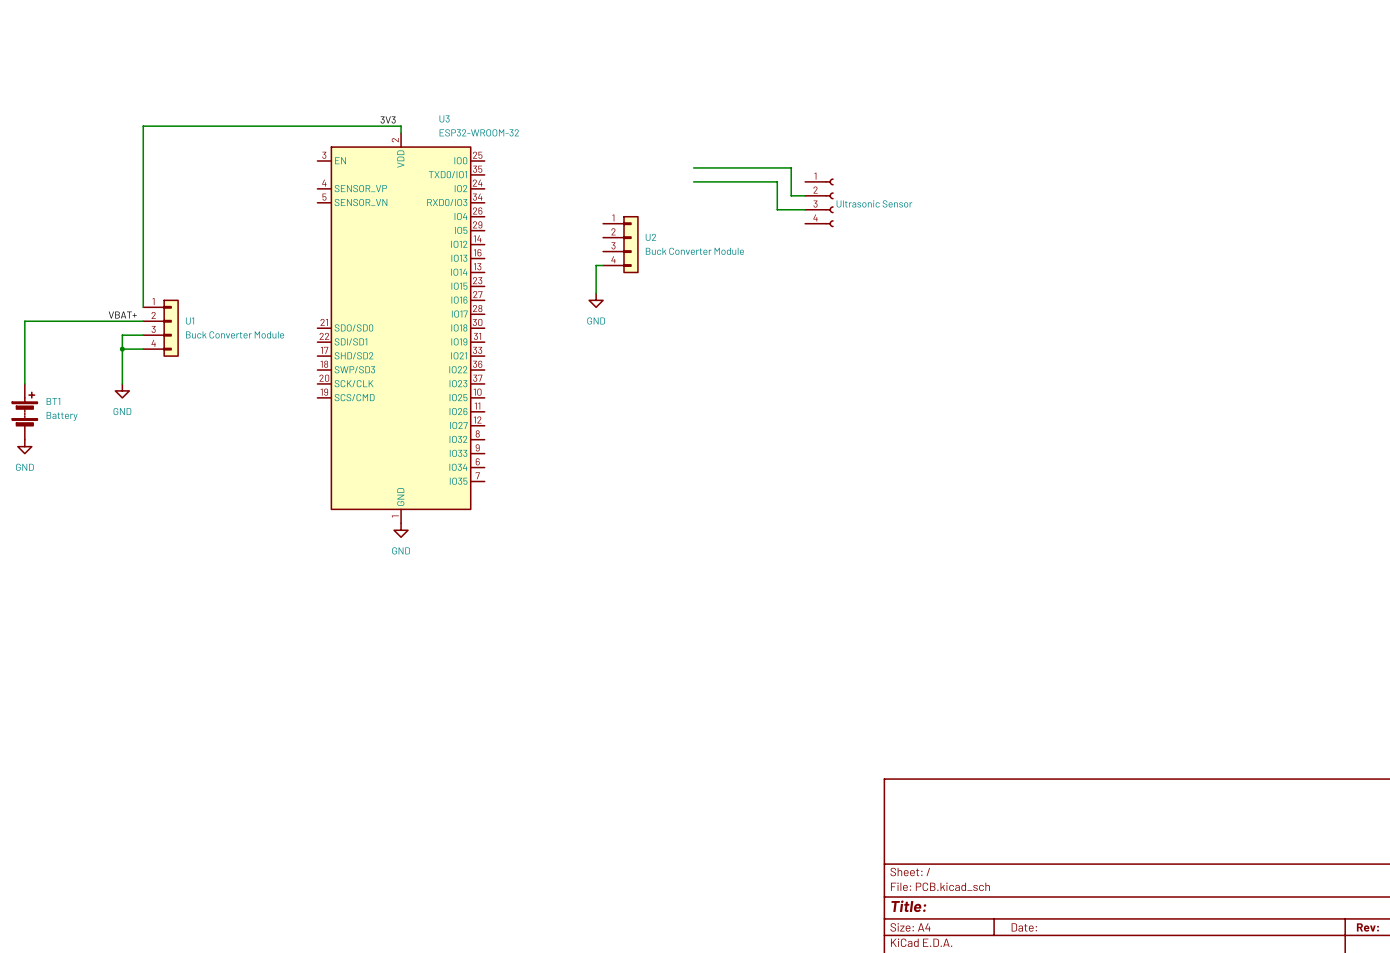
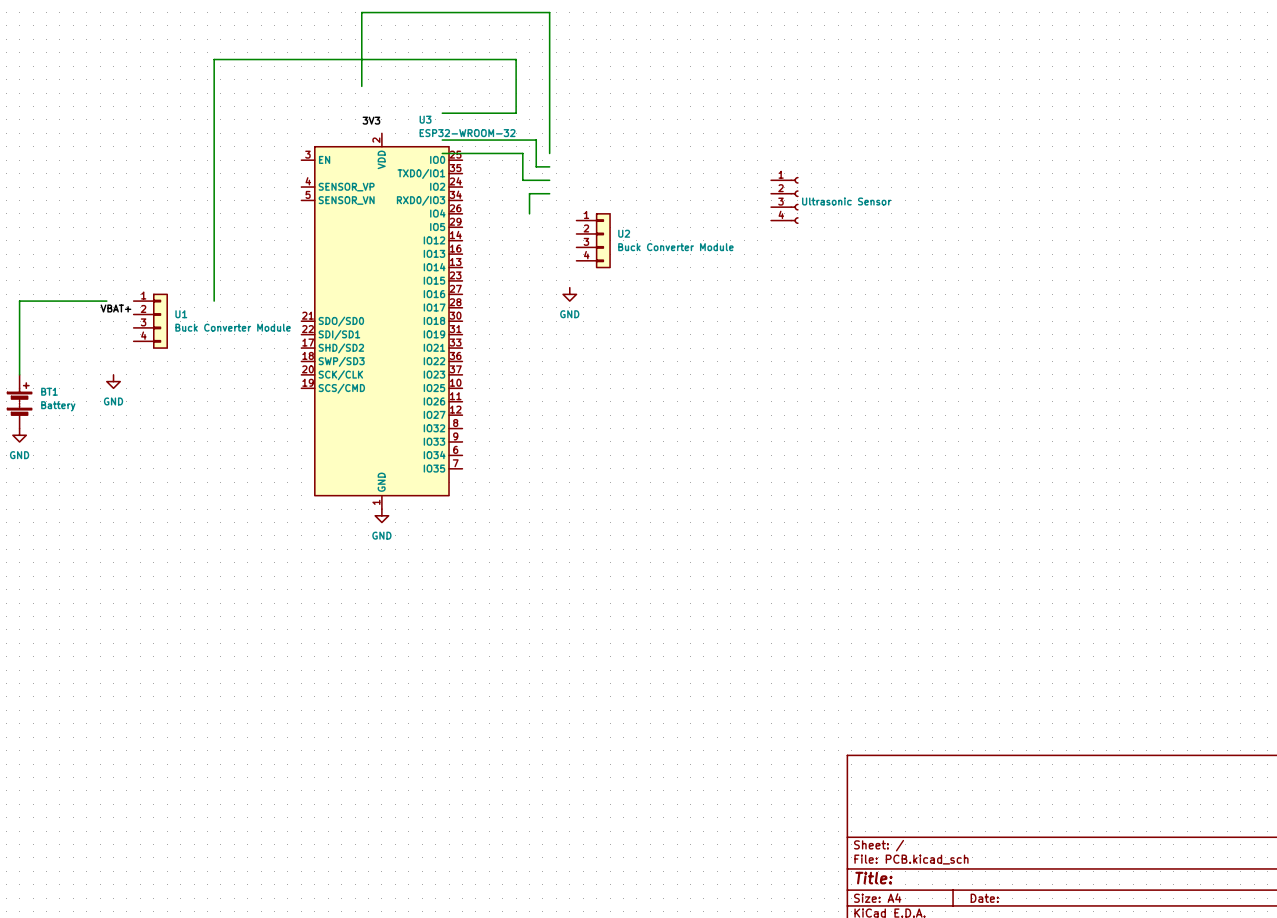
wire: none -> (361, 86) (361, 12) (549, 12) (549, 153)
wire: none -> (442, 113) (516, 113) (516, 59) (214, 59) (214, 301)
wire: (401, 133) (401, 126) (143, 126) (143, 307) -> none
wire: none -> (442, 140) (536, 140) (536, 166) (549, 166)
wire: none -> (442, 153) (522, 153) (522, 180) (549, 180)
wire: (693, 167) (791, 167) (791, 195) (805, 195) -> none
wire: (693, 181) (777, 181) (777, 209) (805, 209) -> none
wire: none -> (549, 193) (529, 193) (529, 213)
wire: (603, 265) (596, 265) (596, 293) -> none
wire: (24, 321) (143, 321) -> (19, 314) (19, 301) (106, 301)
wire: (143, 335) (122, 335) (122, 383) -> none
wire: (122, 349) (143, 349) -> none
junction: (122, 349) -> none

